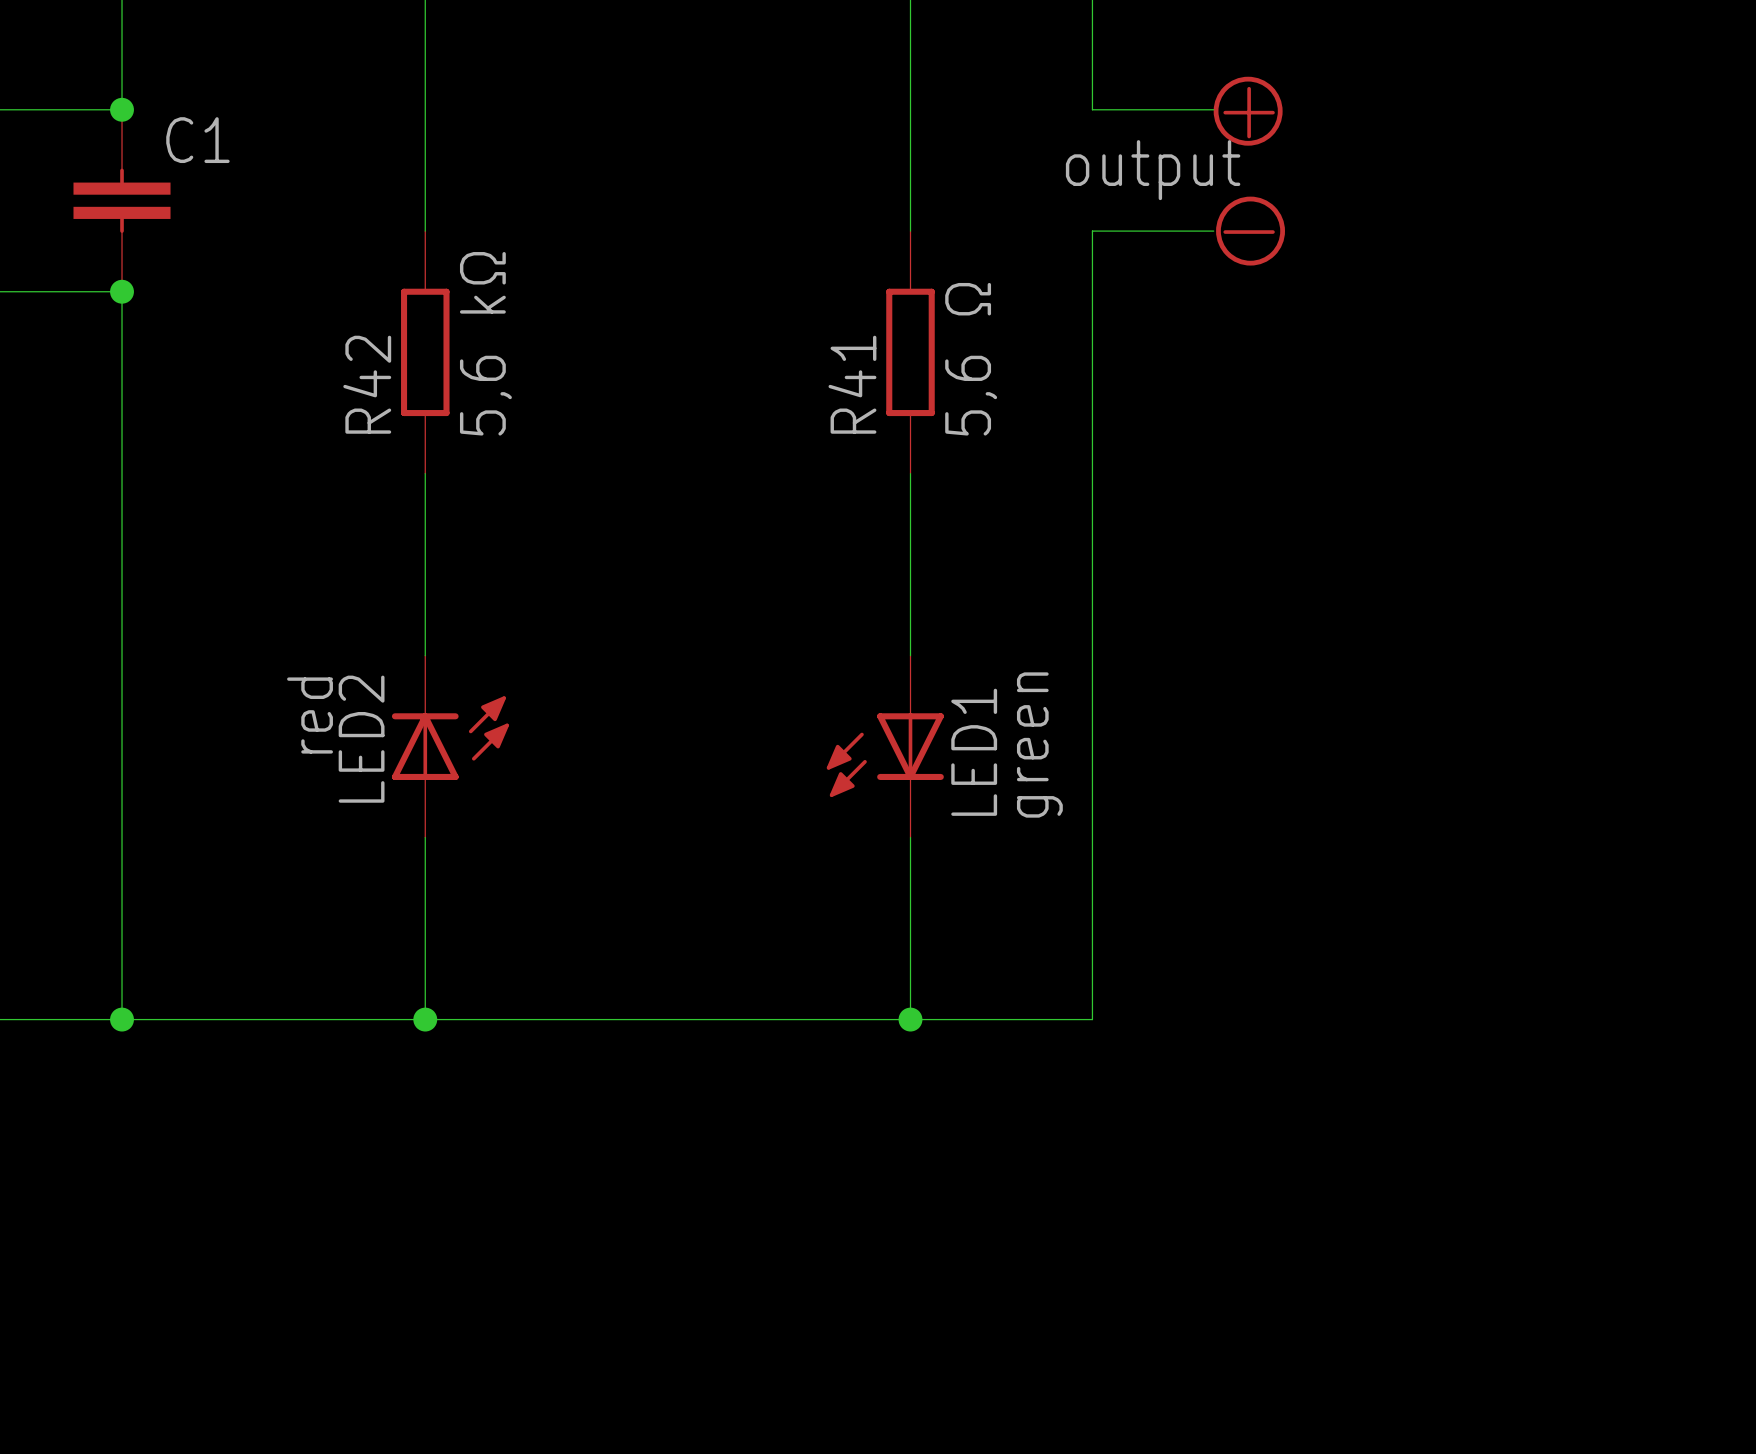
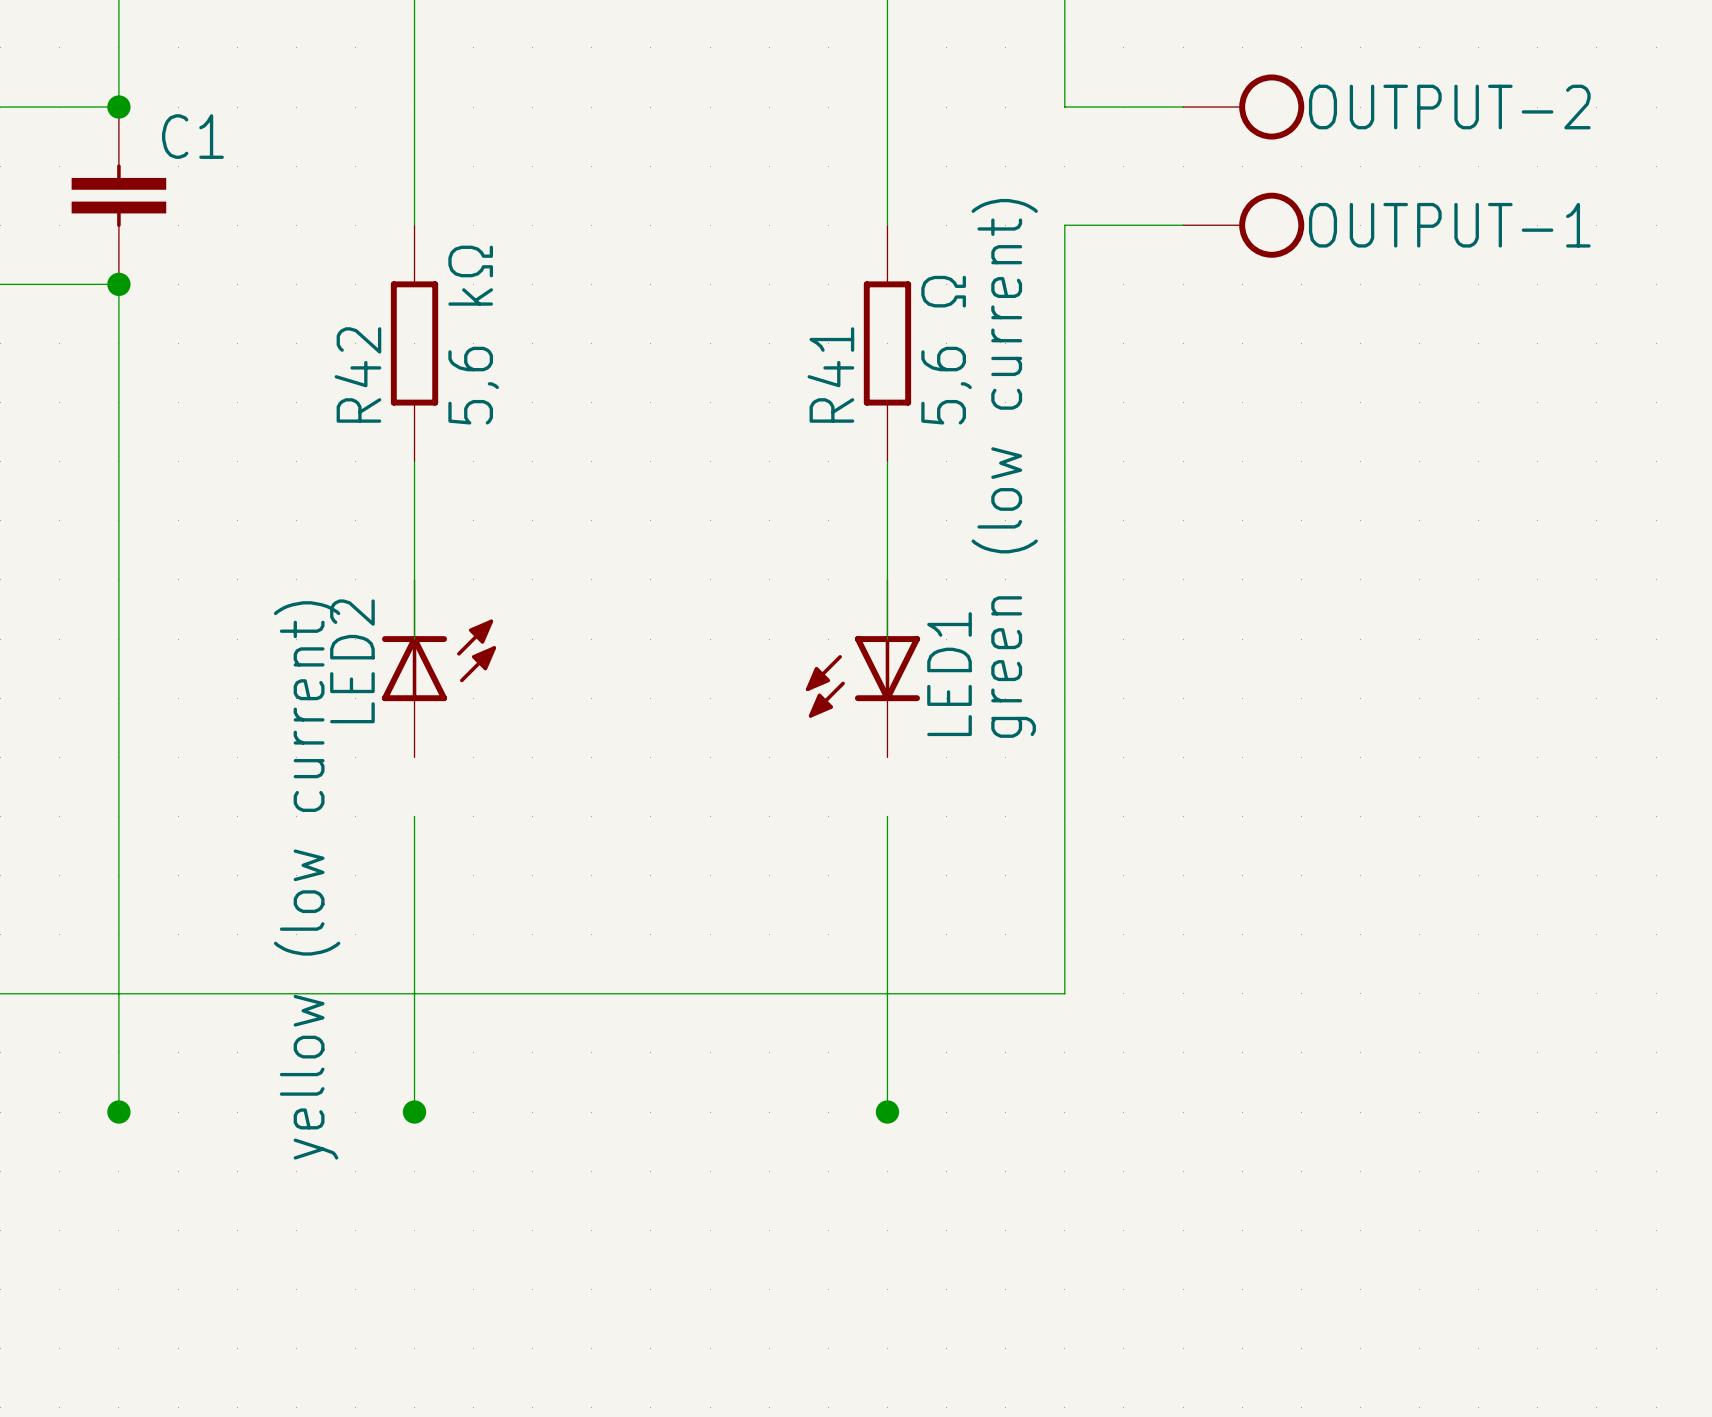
drawing: [1213, 76, 1283, 146] -> none
line: (1249, 88) (1249, 136) -> none
OUTPUT-2: none -> (1243, 107)
line: (1225, 112) (1272, 112) -> none
text: output (1153, 170) -> none
drawing: [1216, 196, 1286, 266] -> none
OUTPUT-1: none -> (1243, 225)
line: (1225, 232) (1272, 232) -> none
LED2 value: red (310, 715) -> yellow (low current) (307, 880)
LED1 value: green (1039, 745) -> green (low current) (1004, 468)
LED2 position: (450, 746) -> (439, 668)
LED1 position: (885, 746) -> (862, 668)
wire: none -> (118, 993) (118, 1112)
junction position: (122, 1019) -> (118, 1112)
wire: none -> (414, 993) (414, 1112)
junction position: (425, 1019) -> (414, 1112)
wire: none -> (887, 993) (887, 1112)
junction position: (910, 1019) -> (887, 1112)

